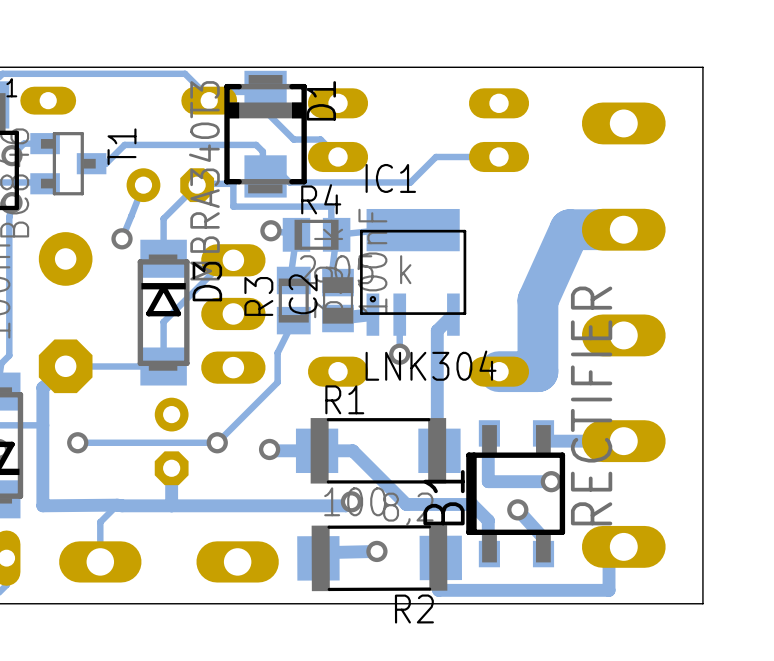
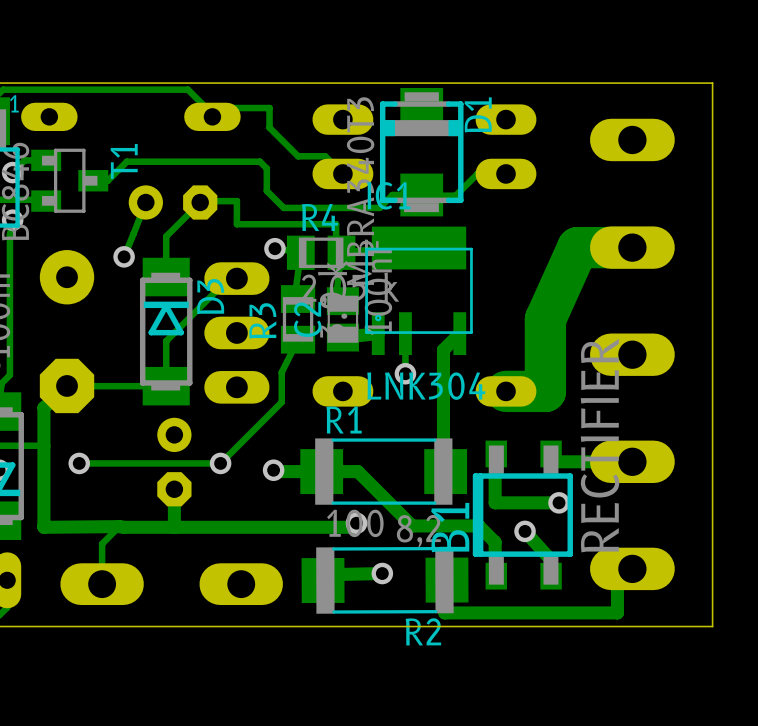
D1 position: (265, 134) -> (421, 152)
track: (470, 156) (435, 156) (410, 182) (289, 182) (272, 165) -> (477, 173) (455, 195) (392, 195) (379, 207) (283, 207) (269, 193)

